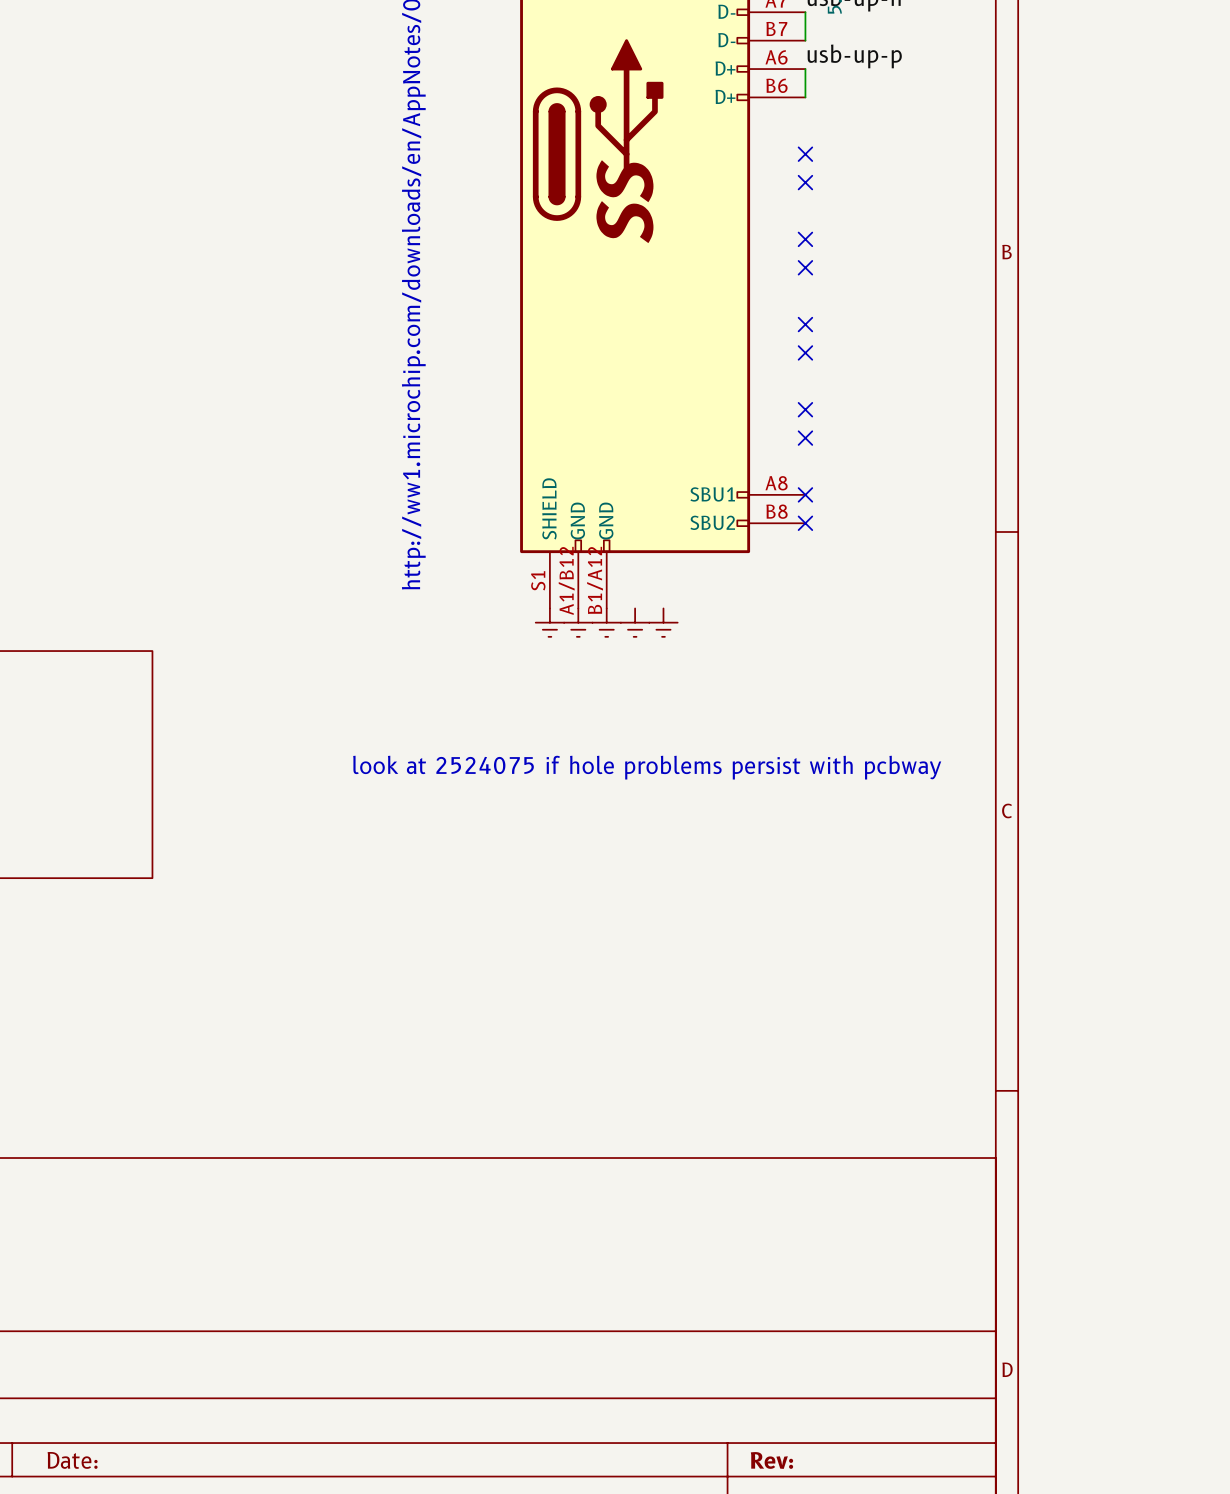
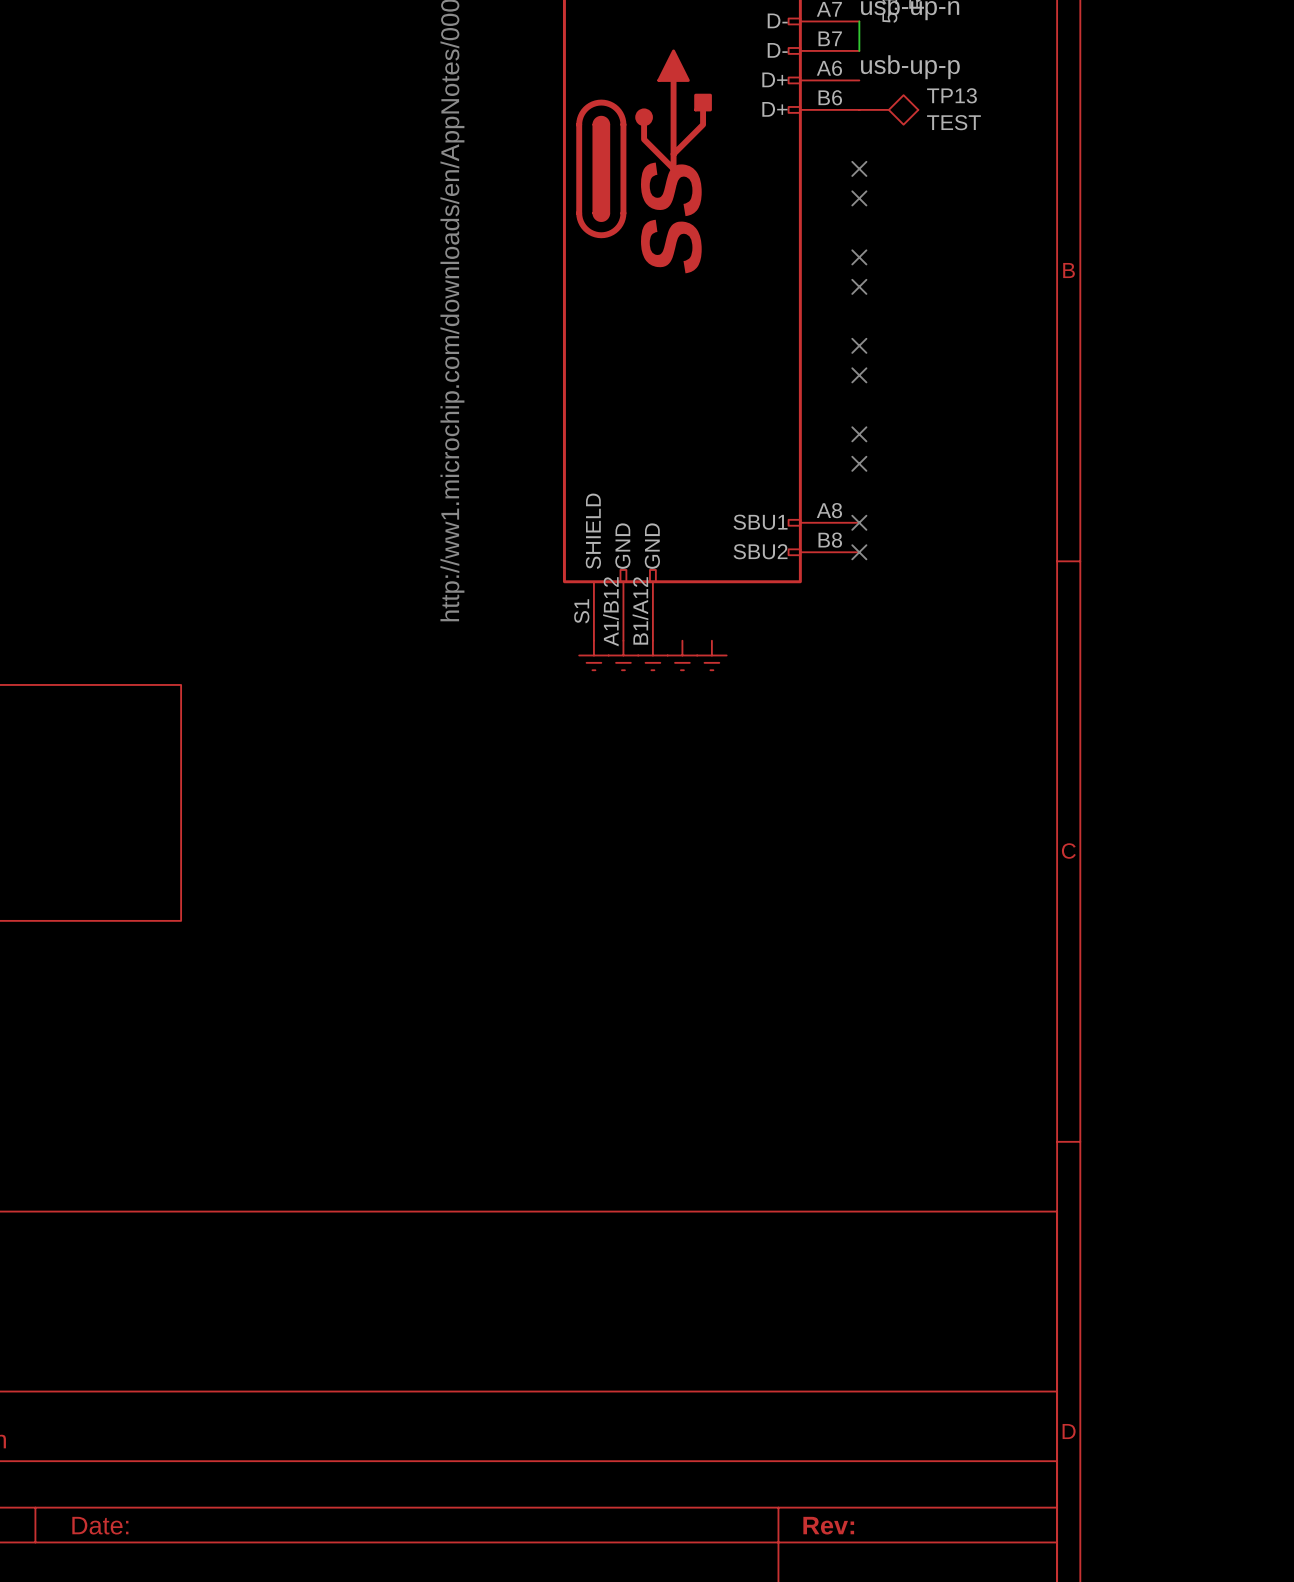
wire: (805, 69) (805, 97) -> none
TP13: none -> TEST (888, 109)
text: look at 2524075 if hole problems persist with pcbway (647, 767) -> none

